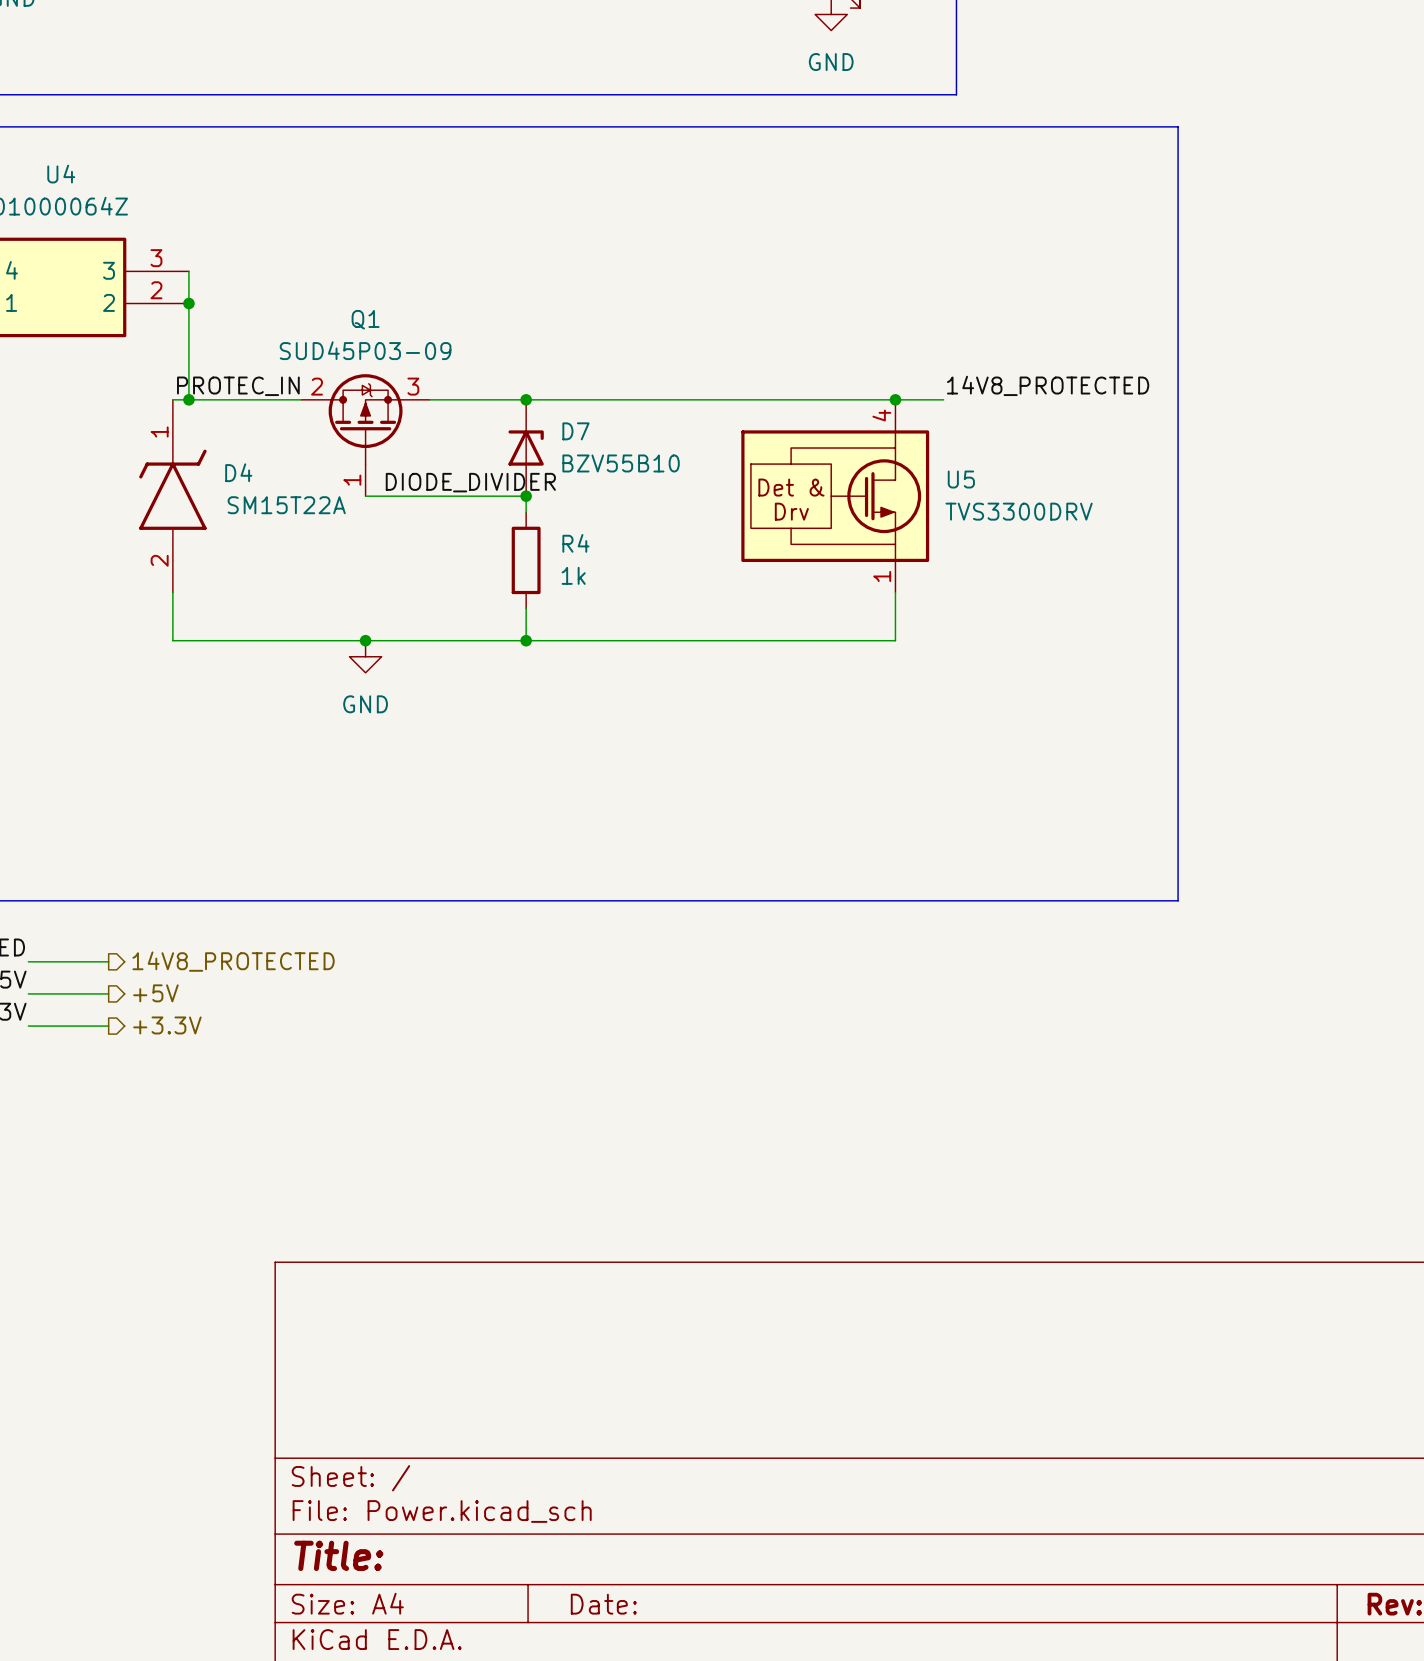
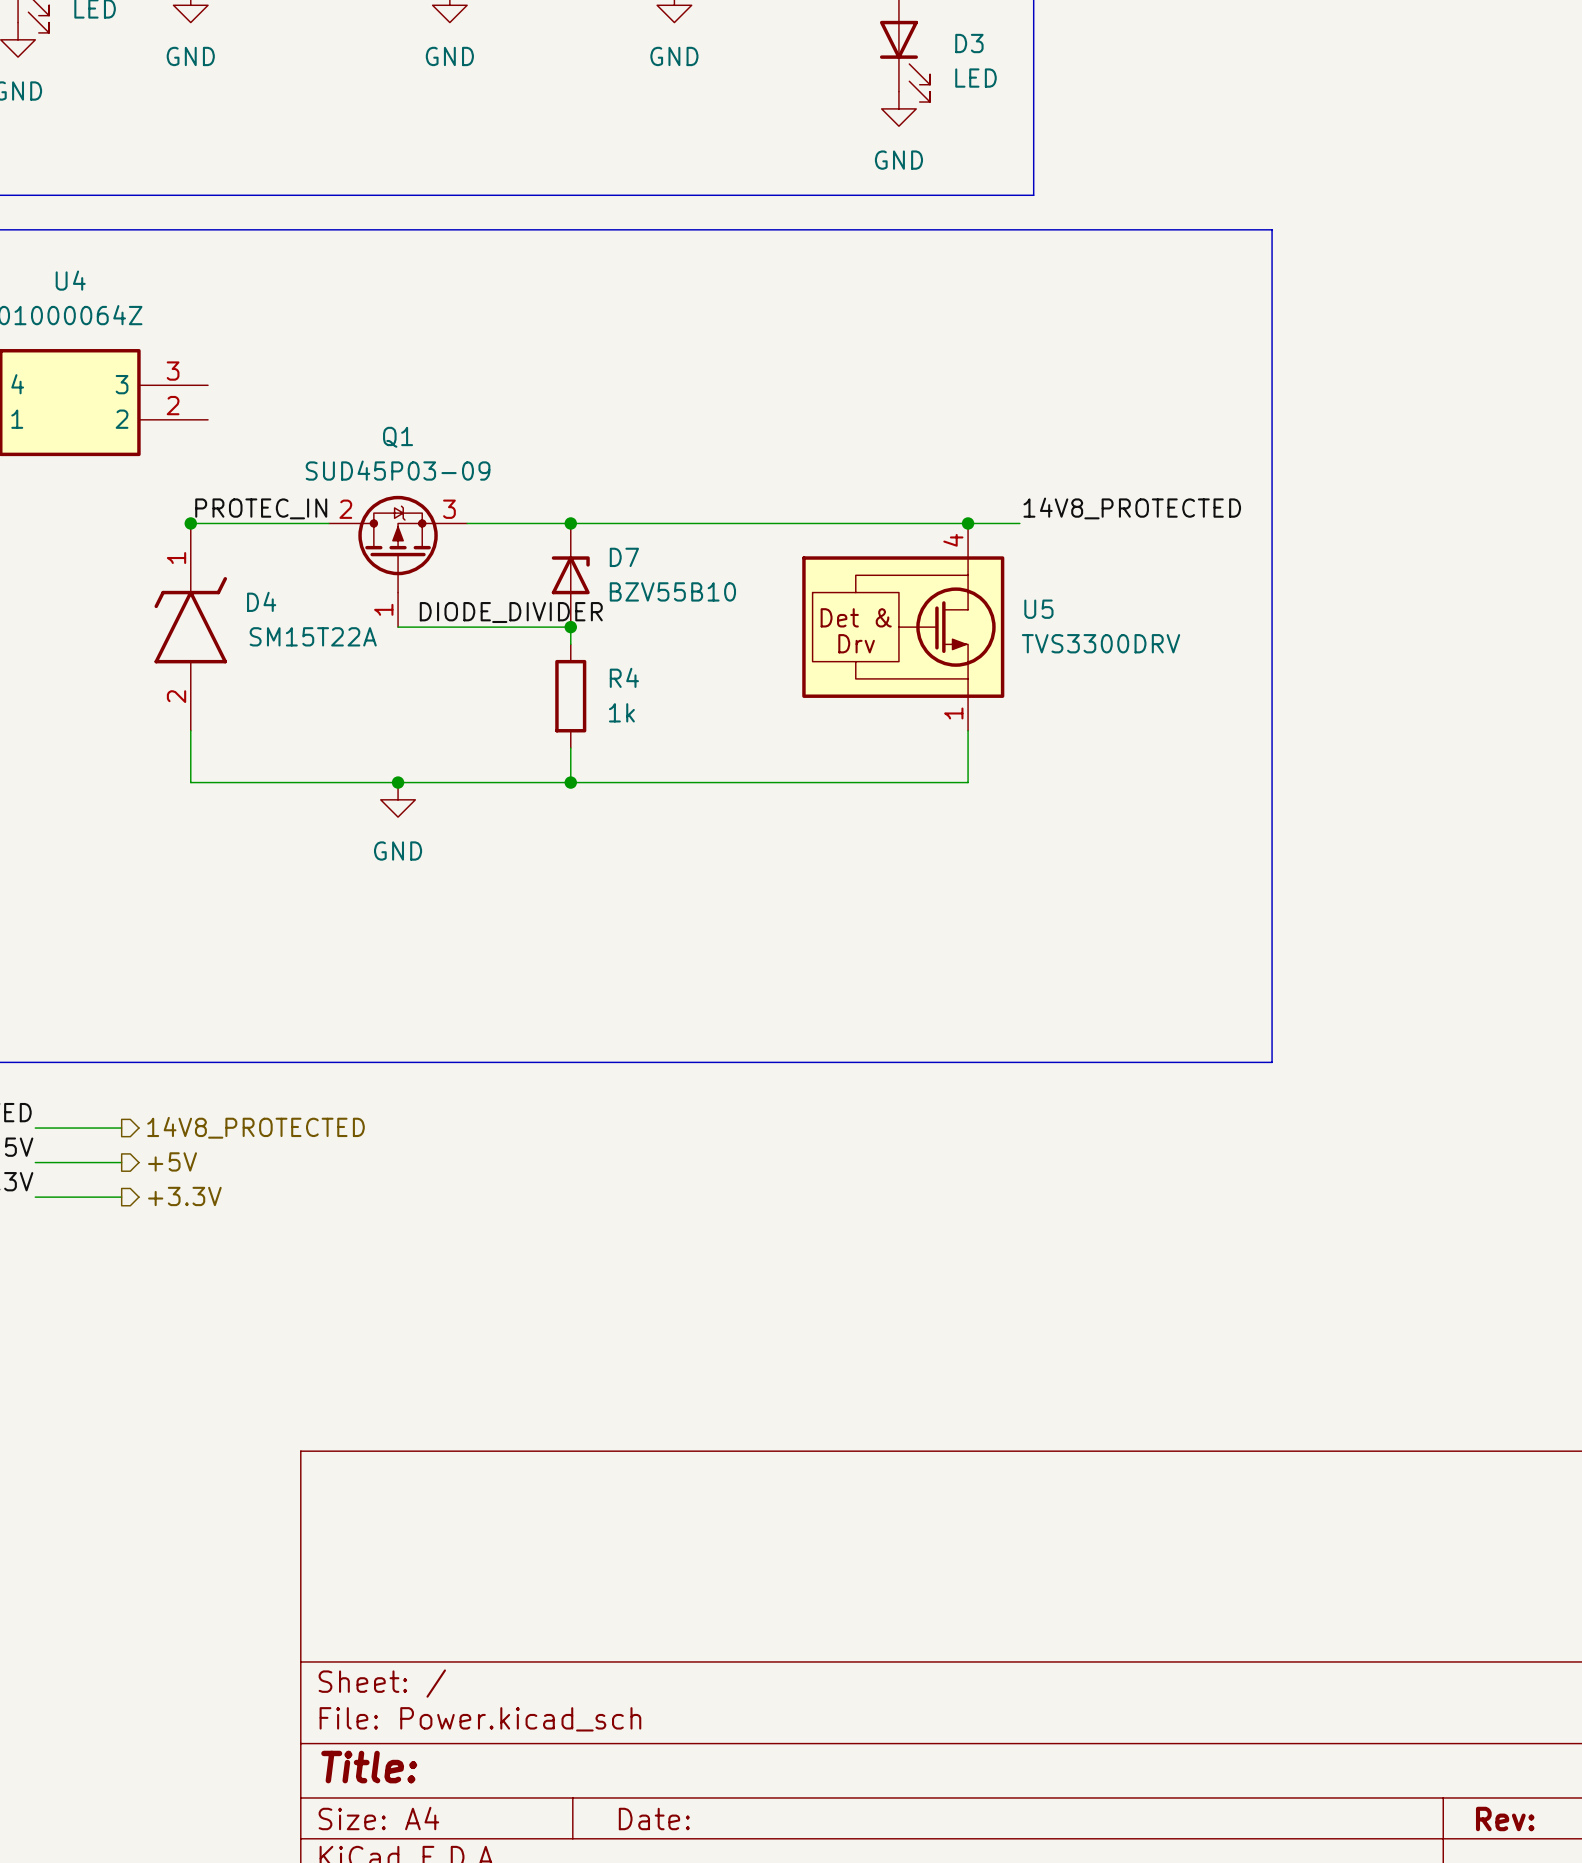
wire: (188, 271) (188, 399) -> none
junction: (188, 303) -> none
junction position: (188, 399) -> (190, 523)

